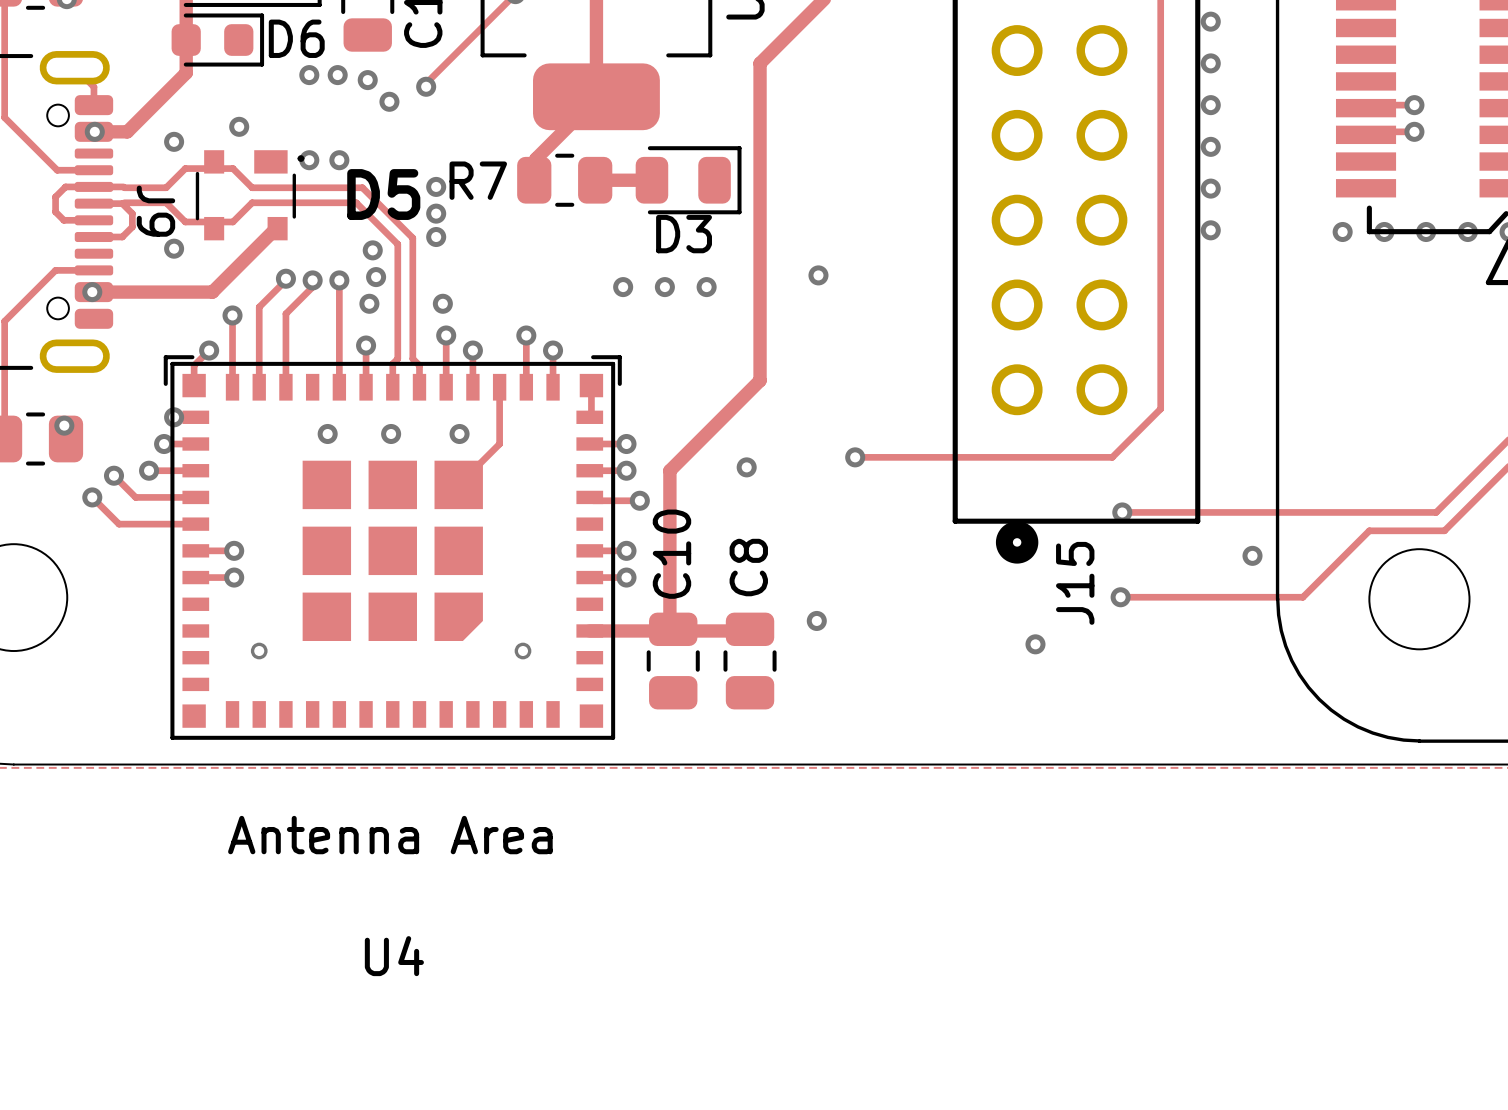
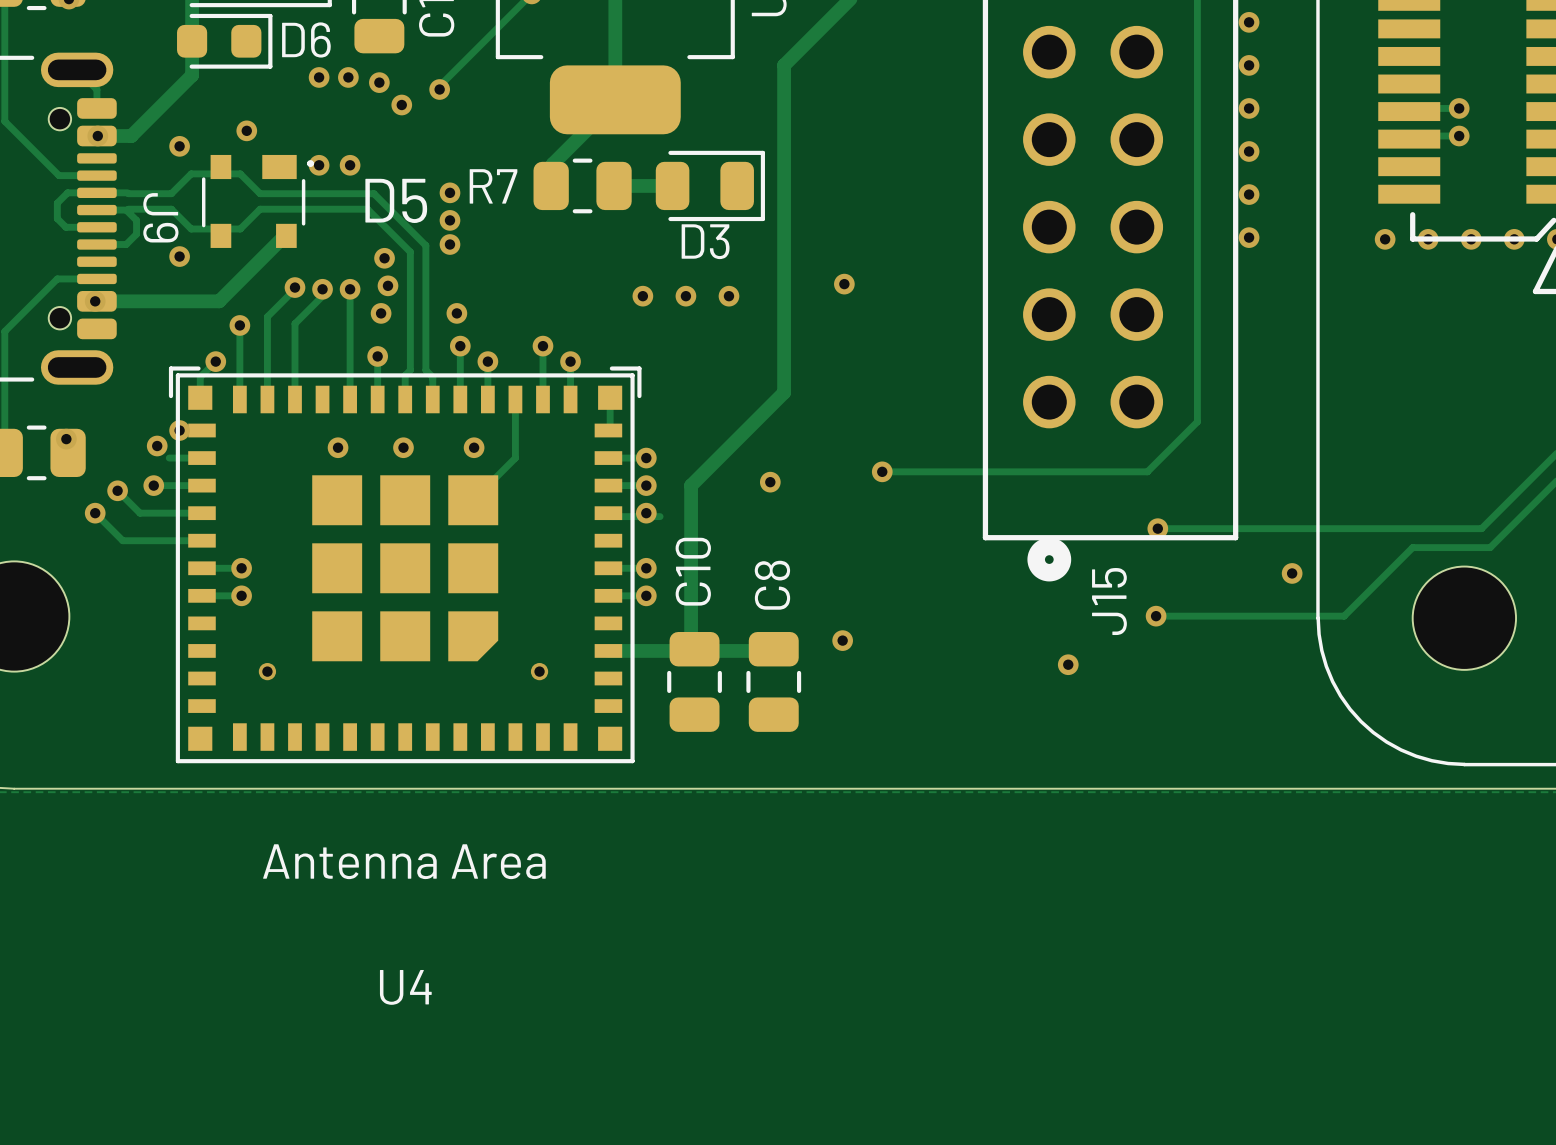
via position: (164, 444) -> (157, 446)
via position: (639, 500) -> (646, 513)

